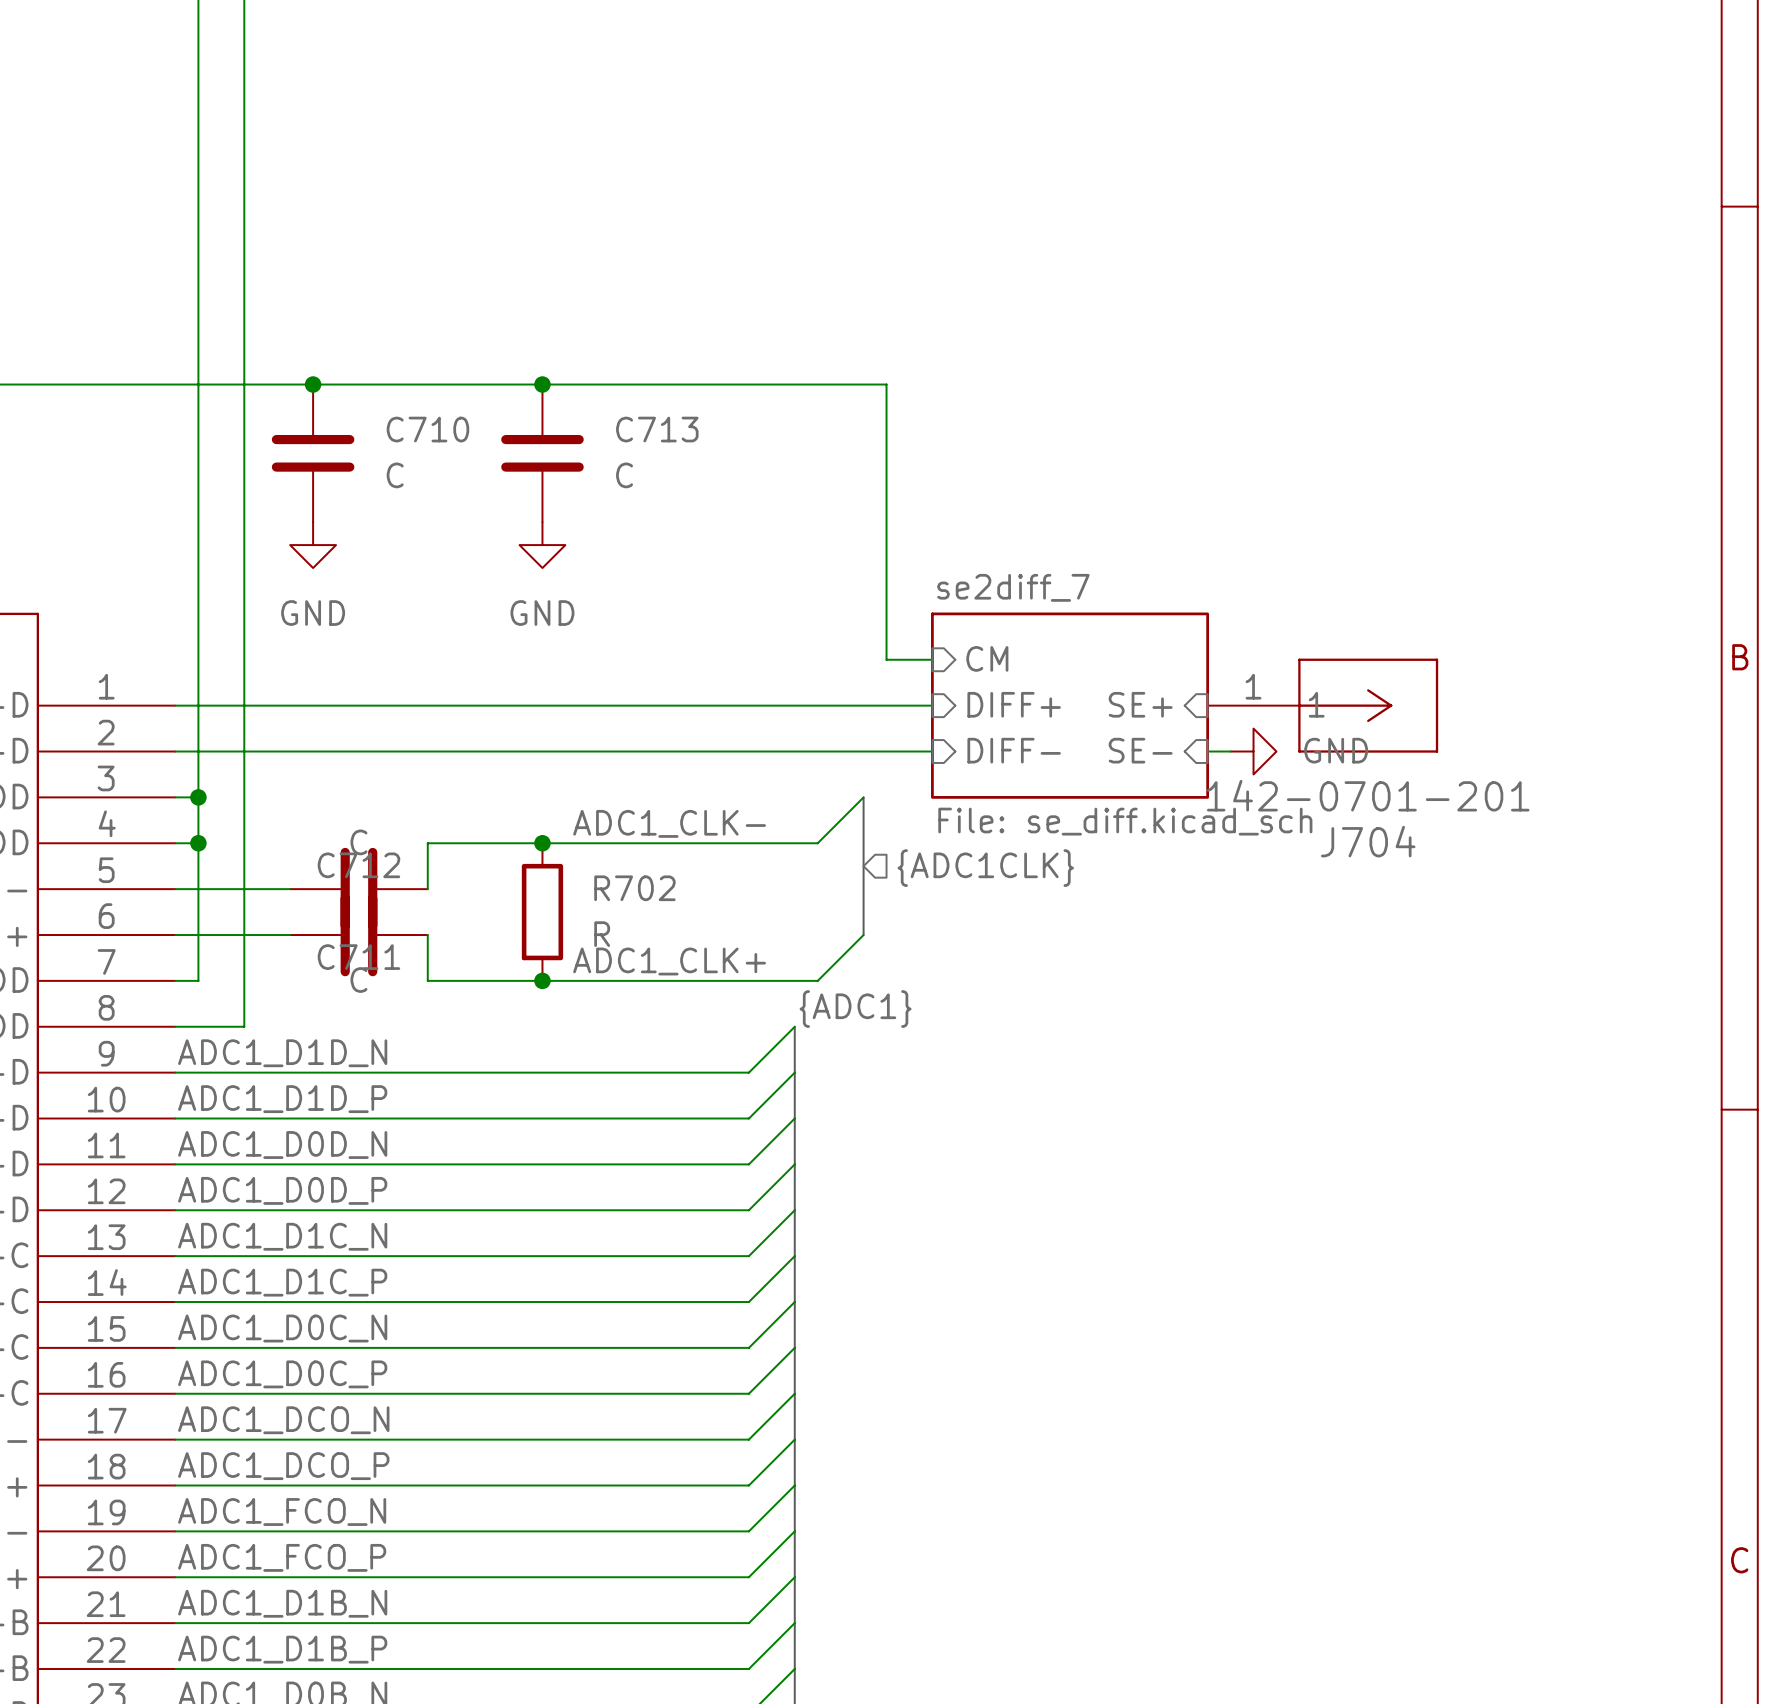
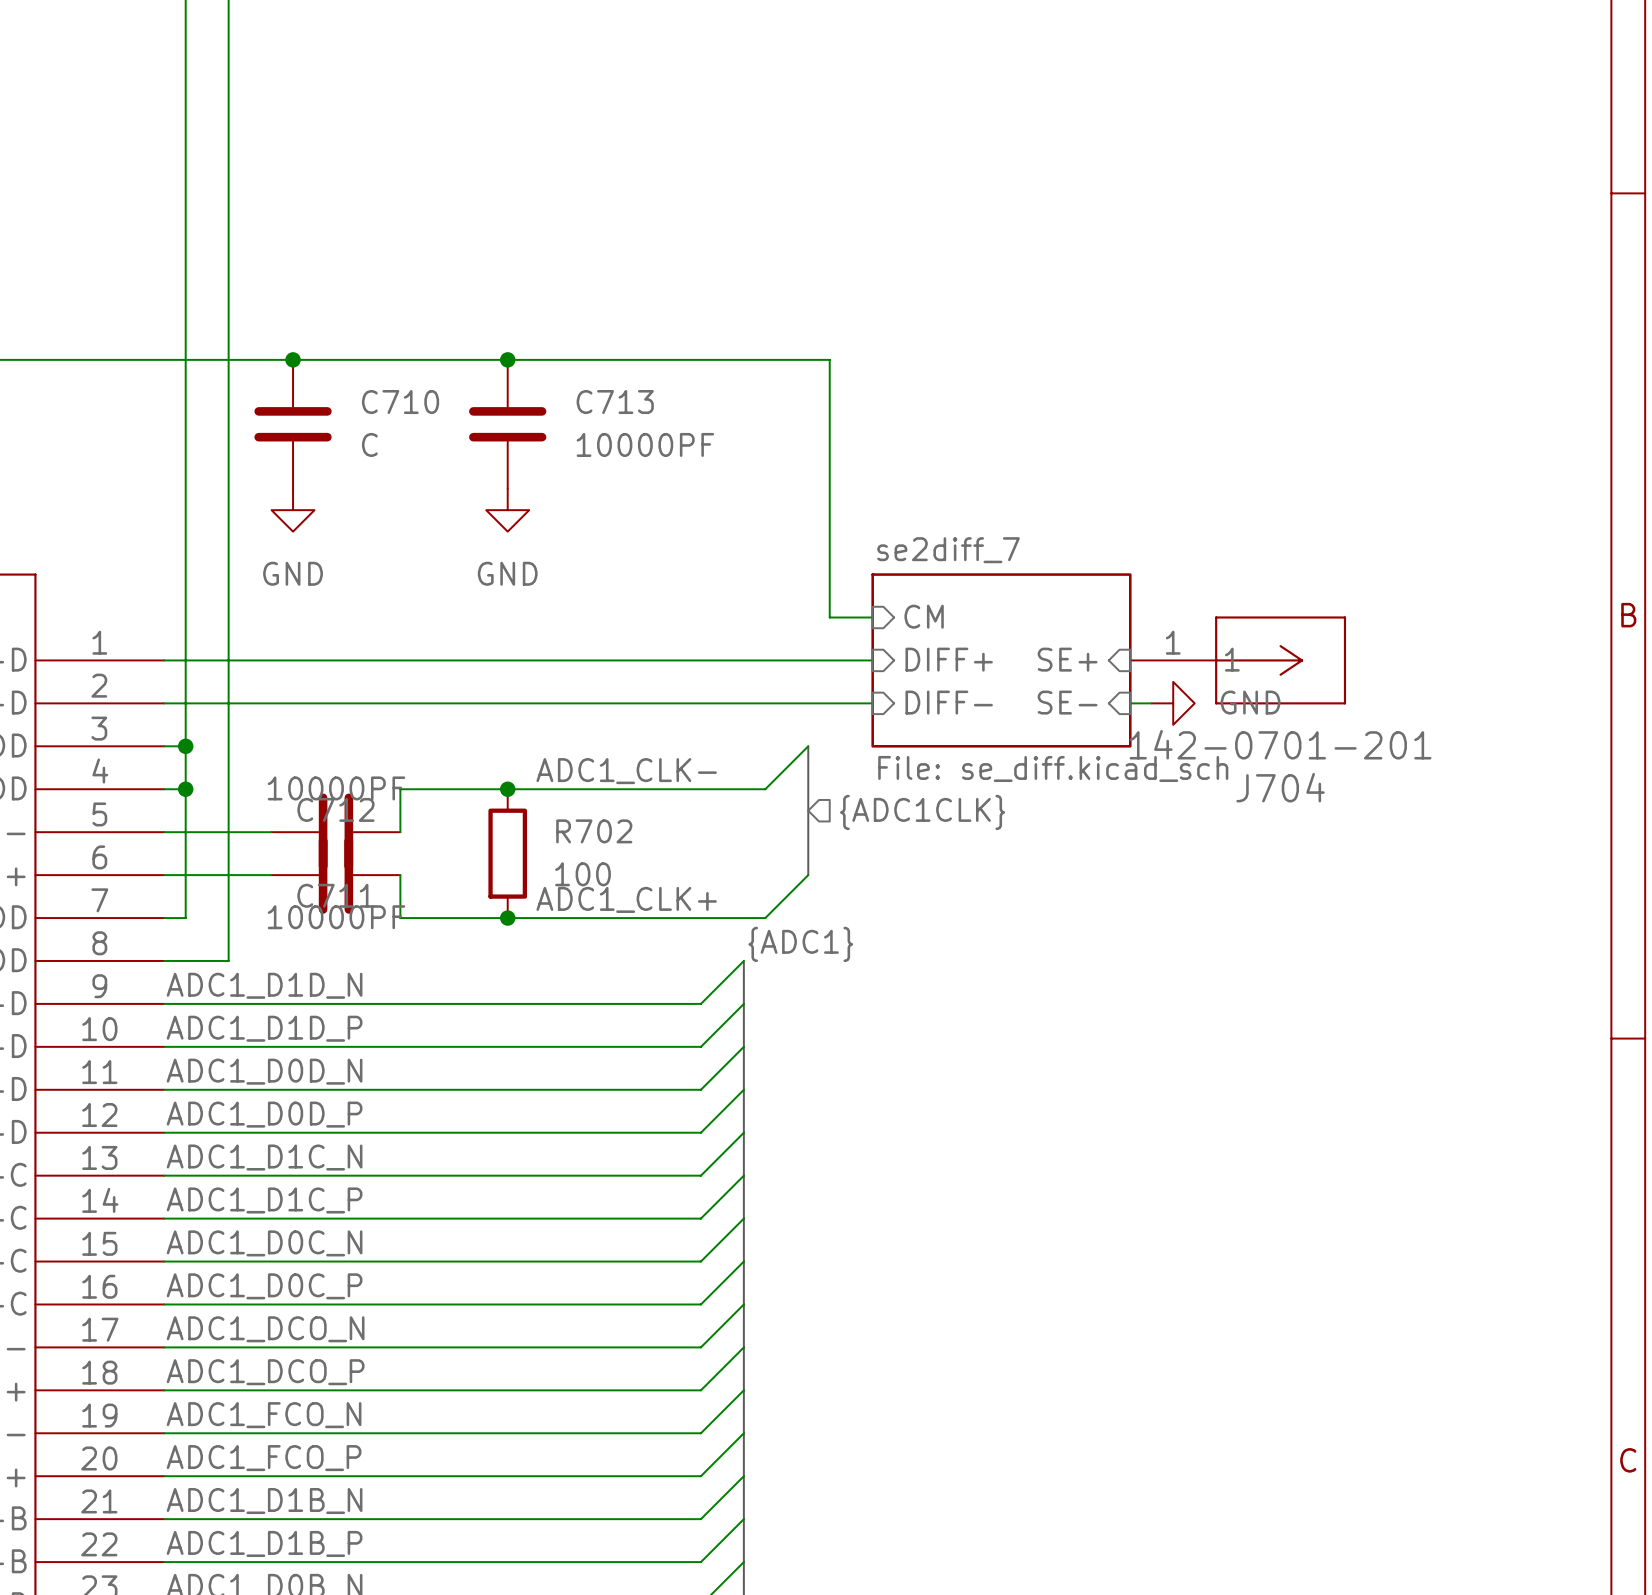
C713 value: C (624, 475) -> 10000PF (645, 444)
C712 value: C (358, 842) -> 10000PF (336, 788)
R702 value: R (602, 934) -> 100 (583, 874)
C711 value: C (358, 980) -> 10000PF (336, 917)

